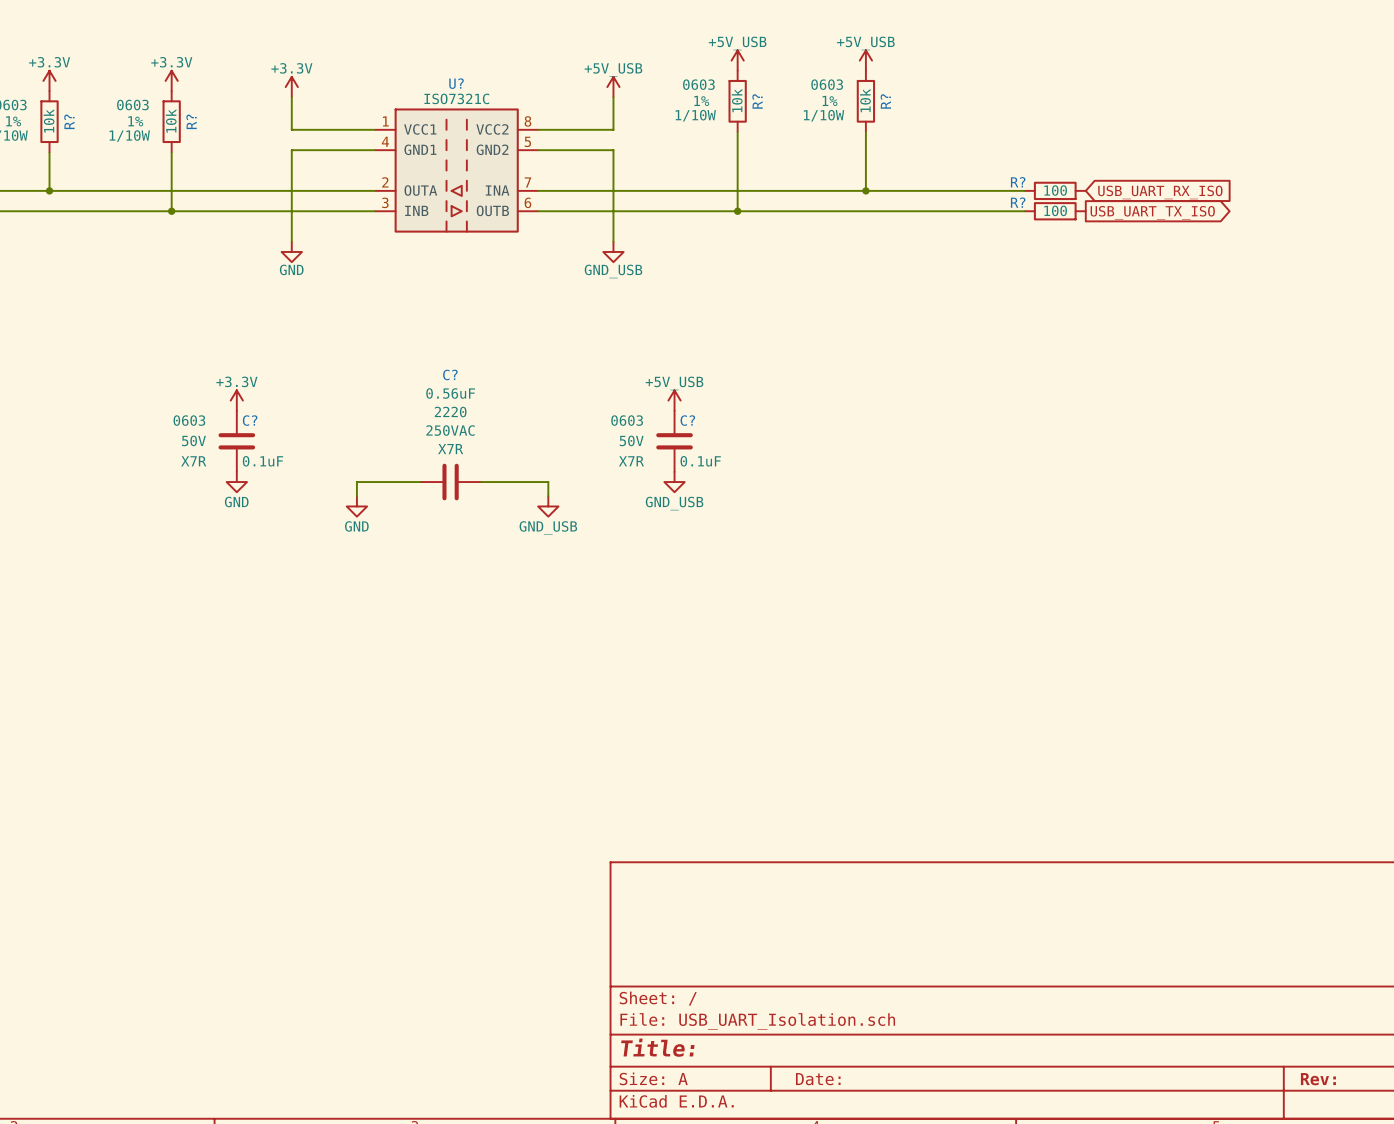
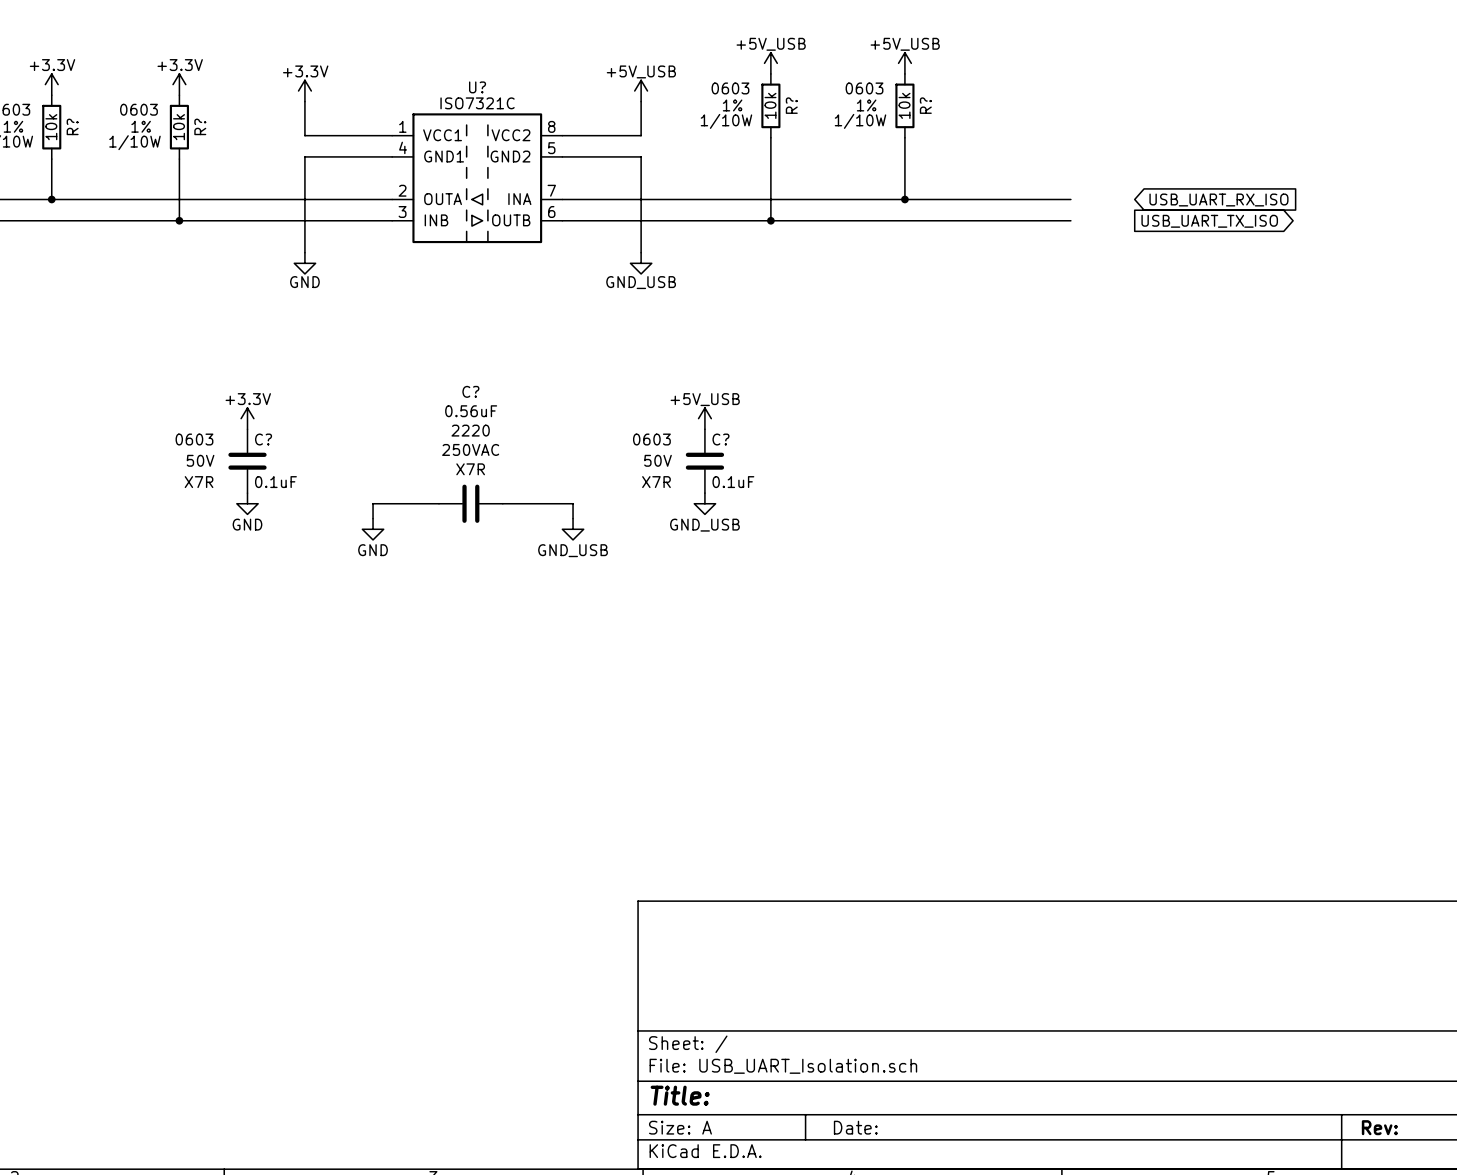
R?: 100 (1055, 190) -> none
R?: 100 (1055, 211) -> none

